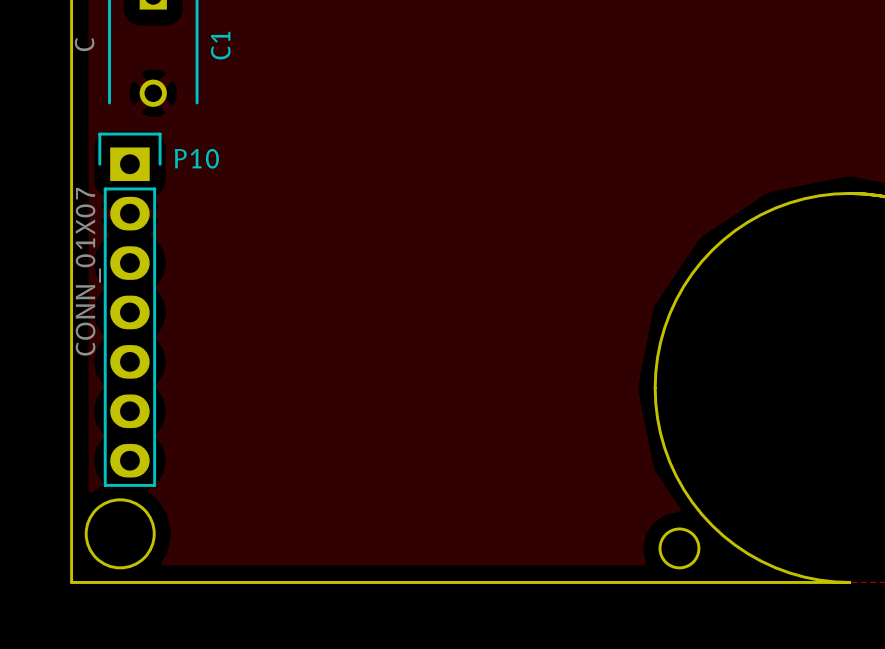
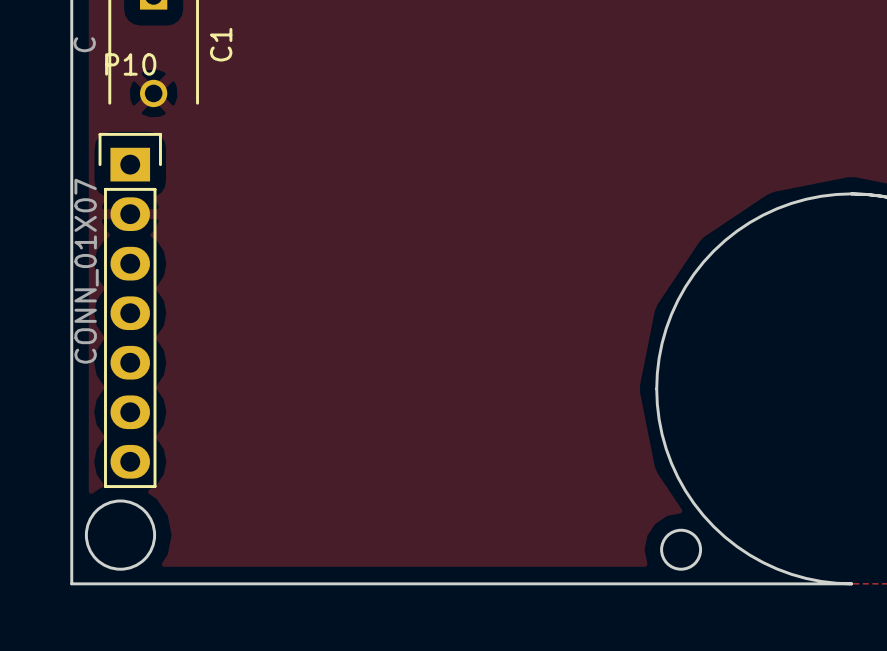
P10 name position: P10 (196, 158) -> P10 (130, 64)

